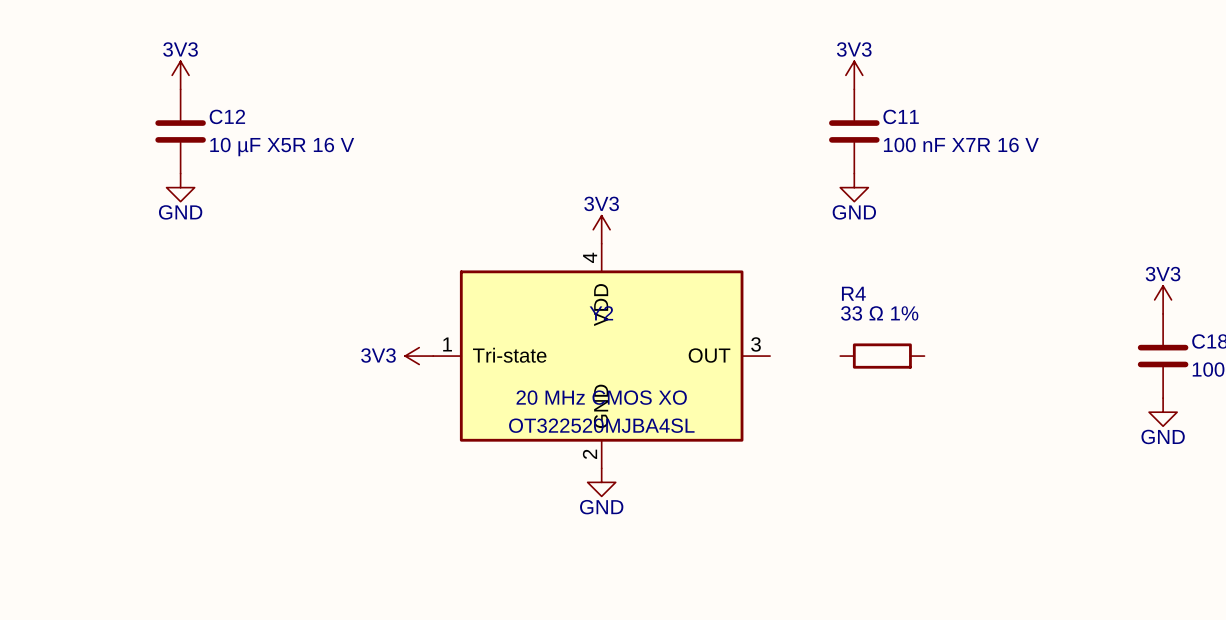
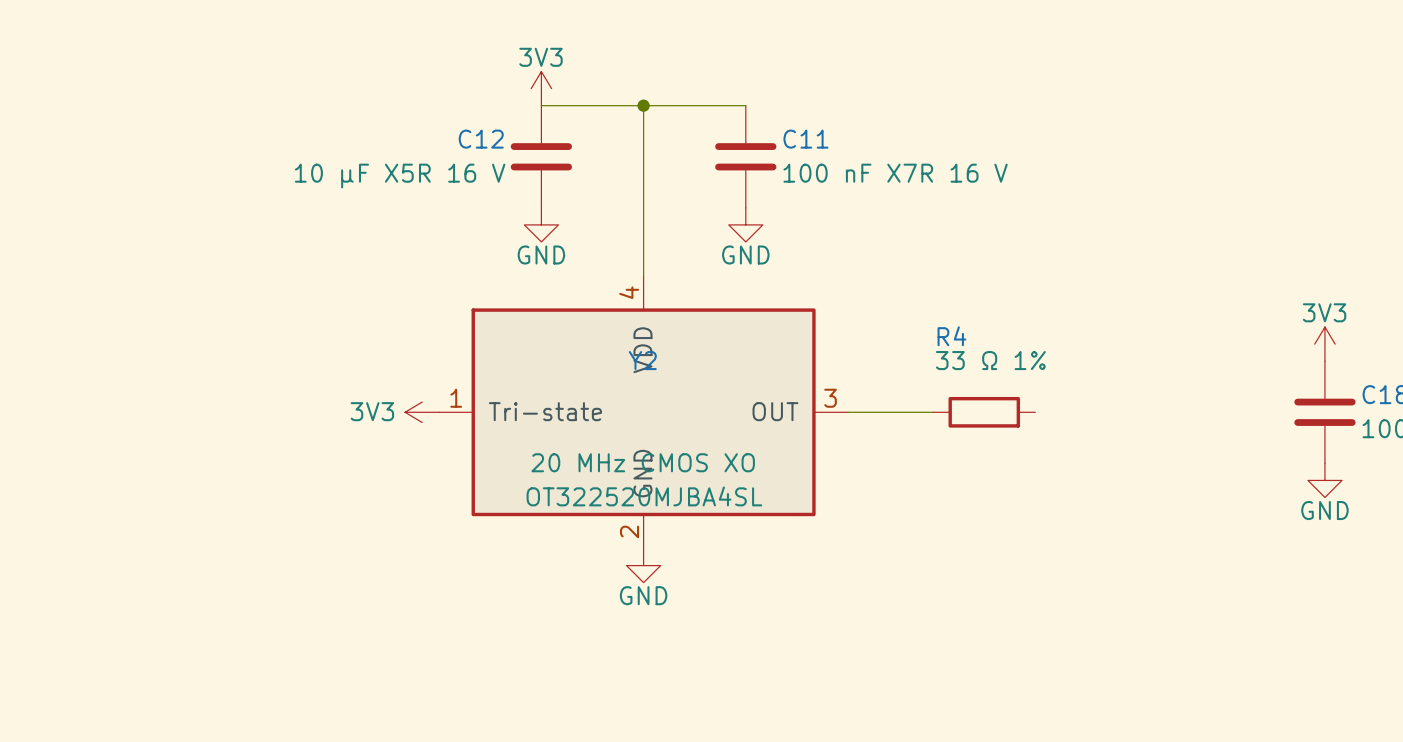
power symbol: 3V3 (180, 75) -> none
power symbol: 3V3 (854, 75) -> none
wire: none -> (541, 105) (745, 105)
wire: none -> (643, 105) (643, 276)
junction: none -> (643, 105)
C12 name position: C12 (227, 116) -> C12 (481, 139)
C12 position: (180, 131) -> (541, 156)
C11 position: (854, 131) -> (745, 156)
C12 value position: 10 µF X5R 16 V (282, 147) -> 10 µF X5R 16 V (400, 176)
power symbol: GND (180, 187) -> none
power symbol: GND (854, 187) -> none
power symbol: none -> GND (541, 224)
power symbol: none -> GND (745, 224)
power symbol position: 3V3 (601, 229) -> 3V3 (541, 88)
wire: none -> (848, 412) (933, 412)

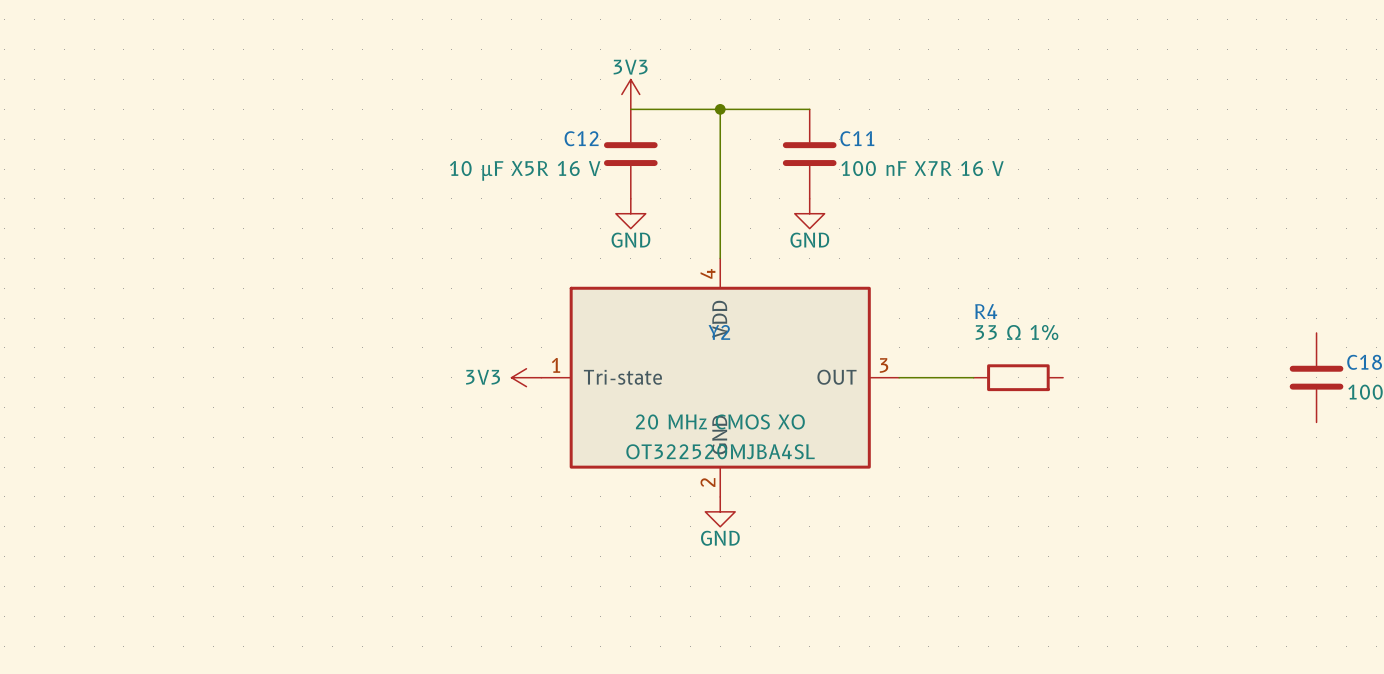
power symbol: 3V3 (1324, 344) -> none
power symbol: GND (1324, 480) -> none

